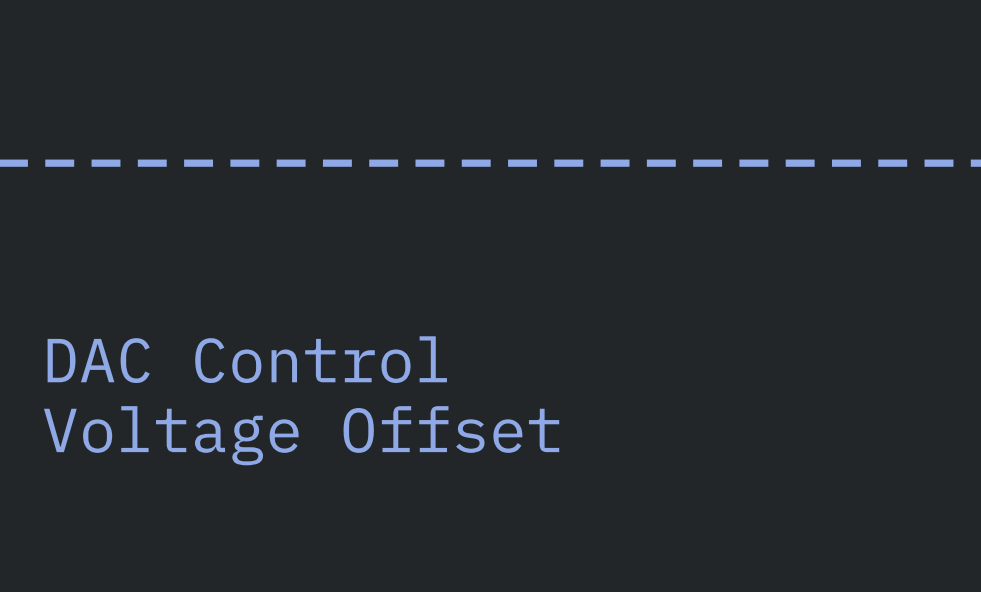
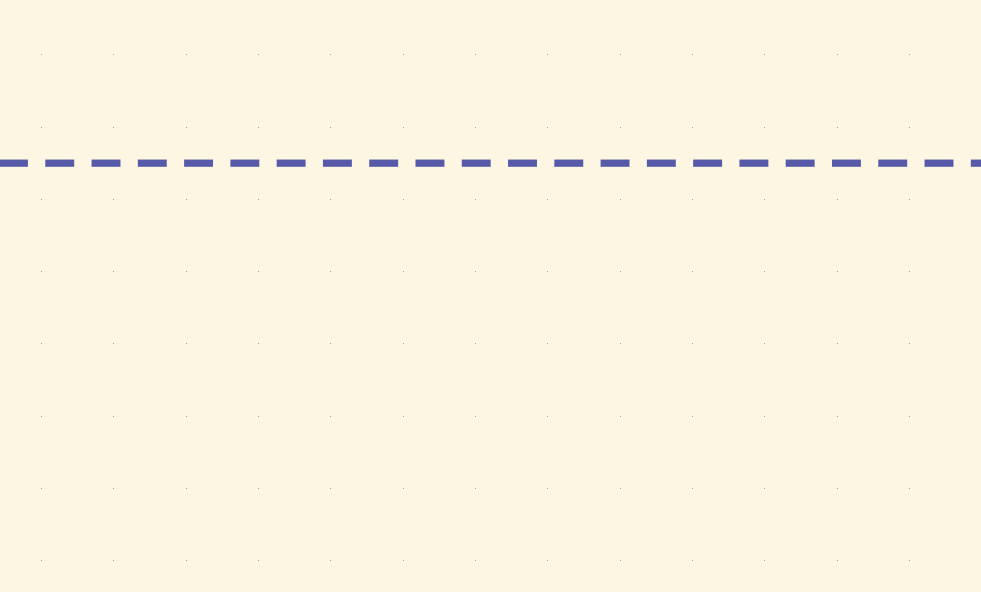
text: DAC Control (247, 359) -> none
text: Voltage Offset (301, 435) -> none

